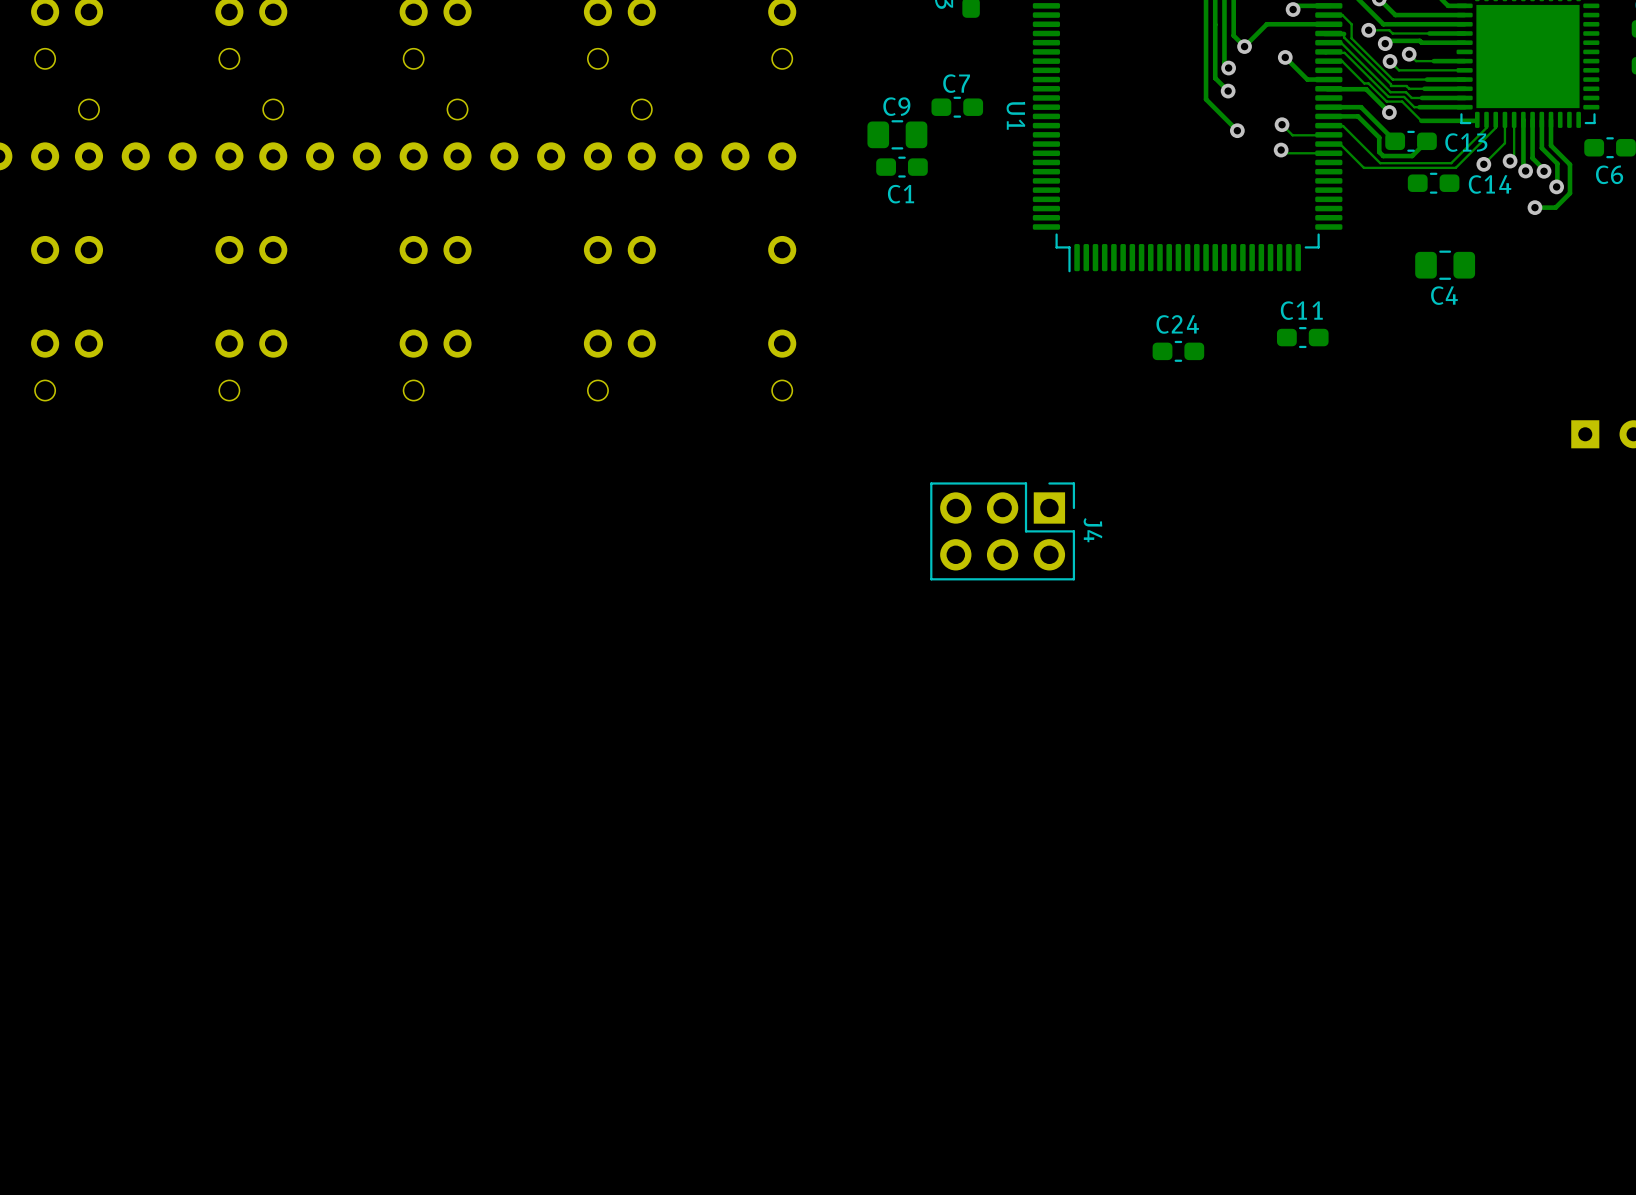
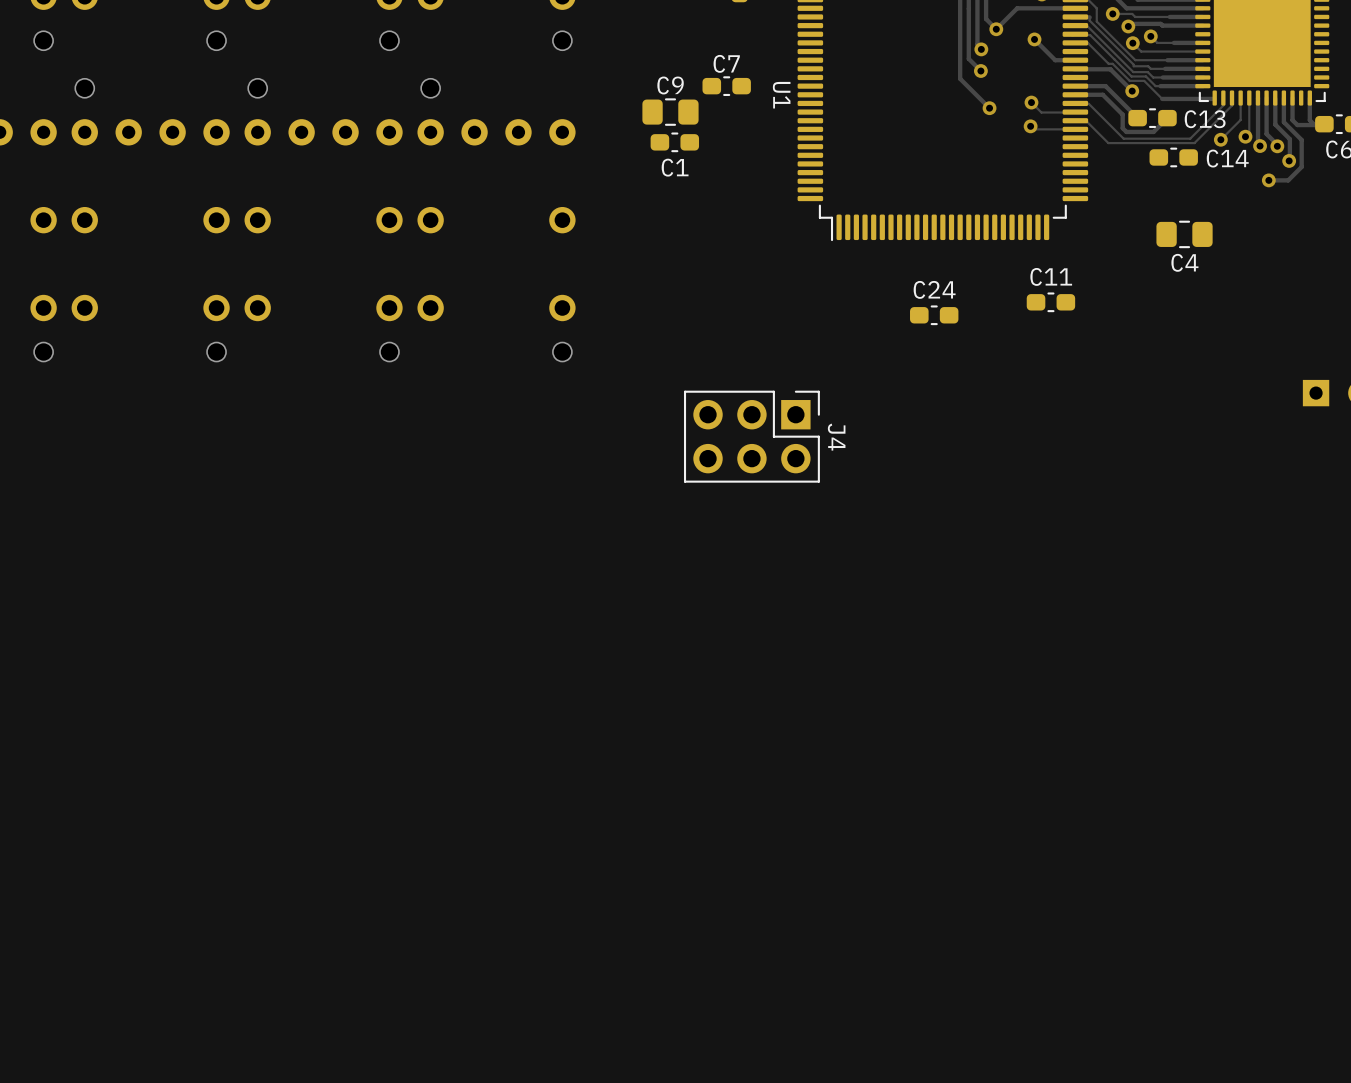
track: none -> (1309, 98) (1309, 120) (1314, 125) (1297, 125) (1292, 120) (1292, 98)
J4 position: (1002, 531) -> (751, 436)

